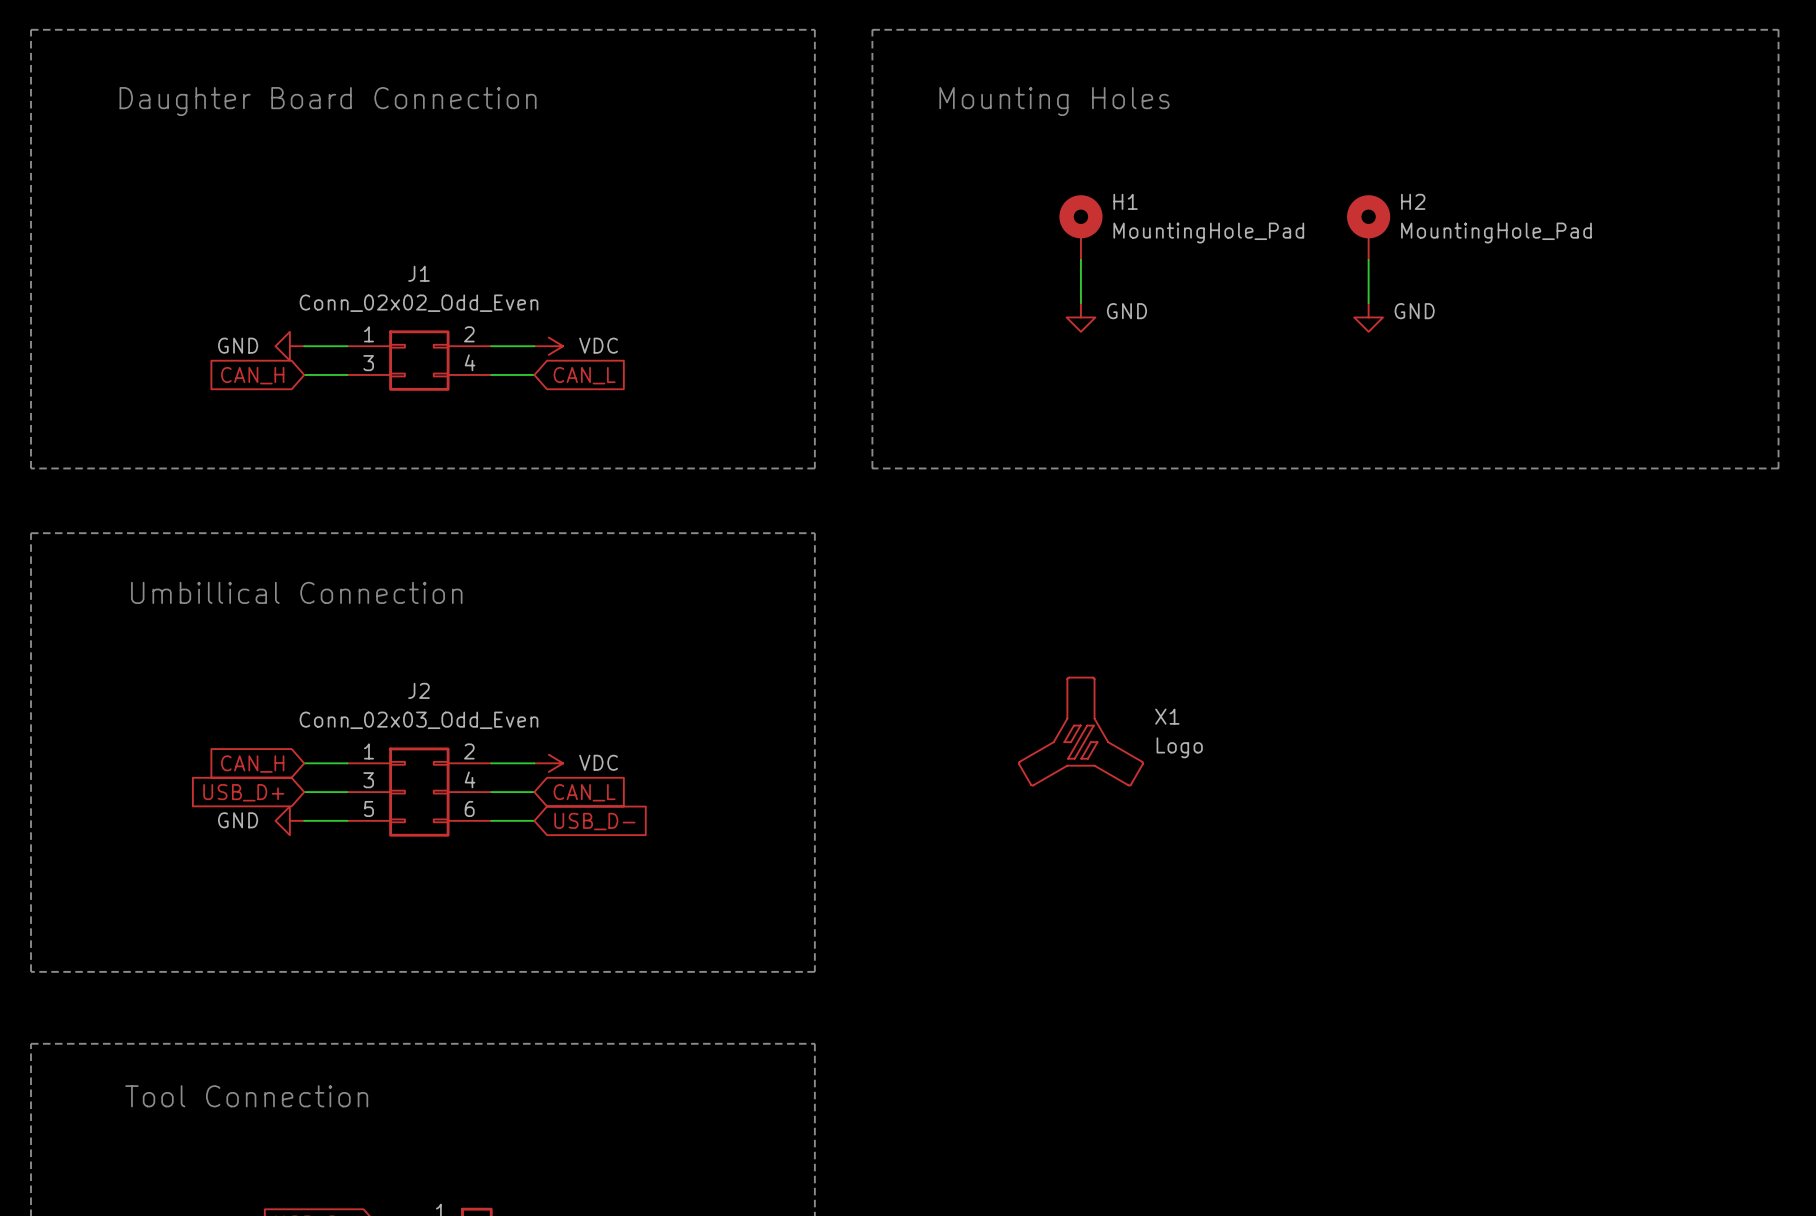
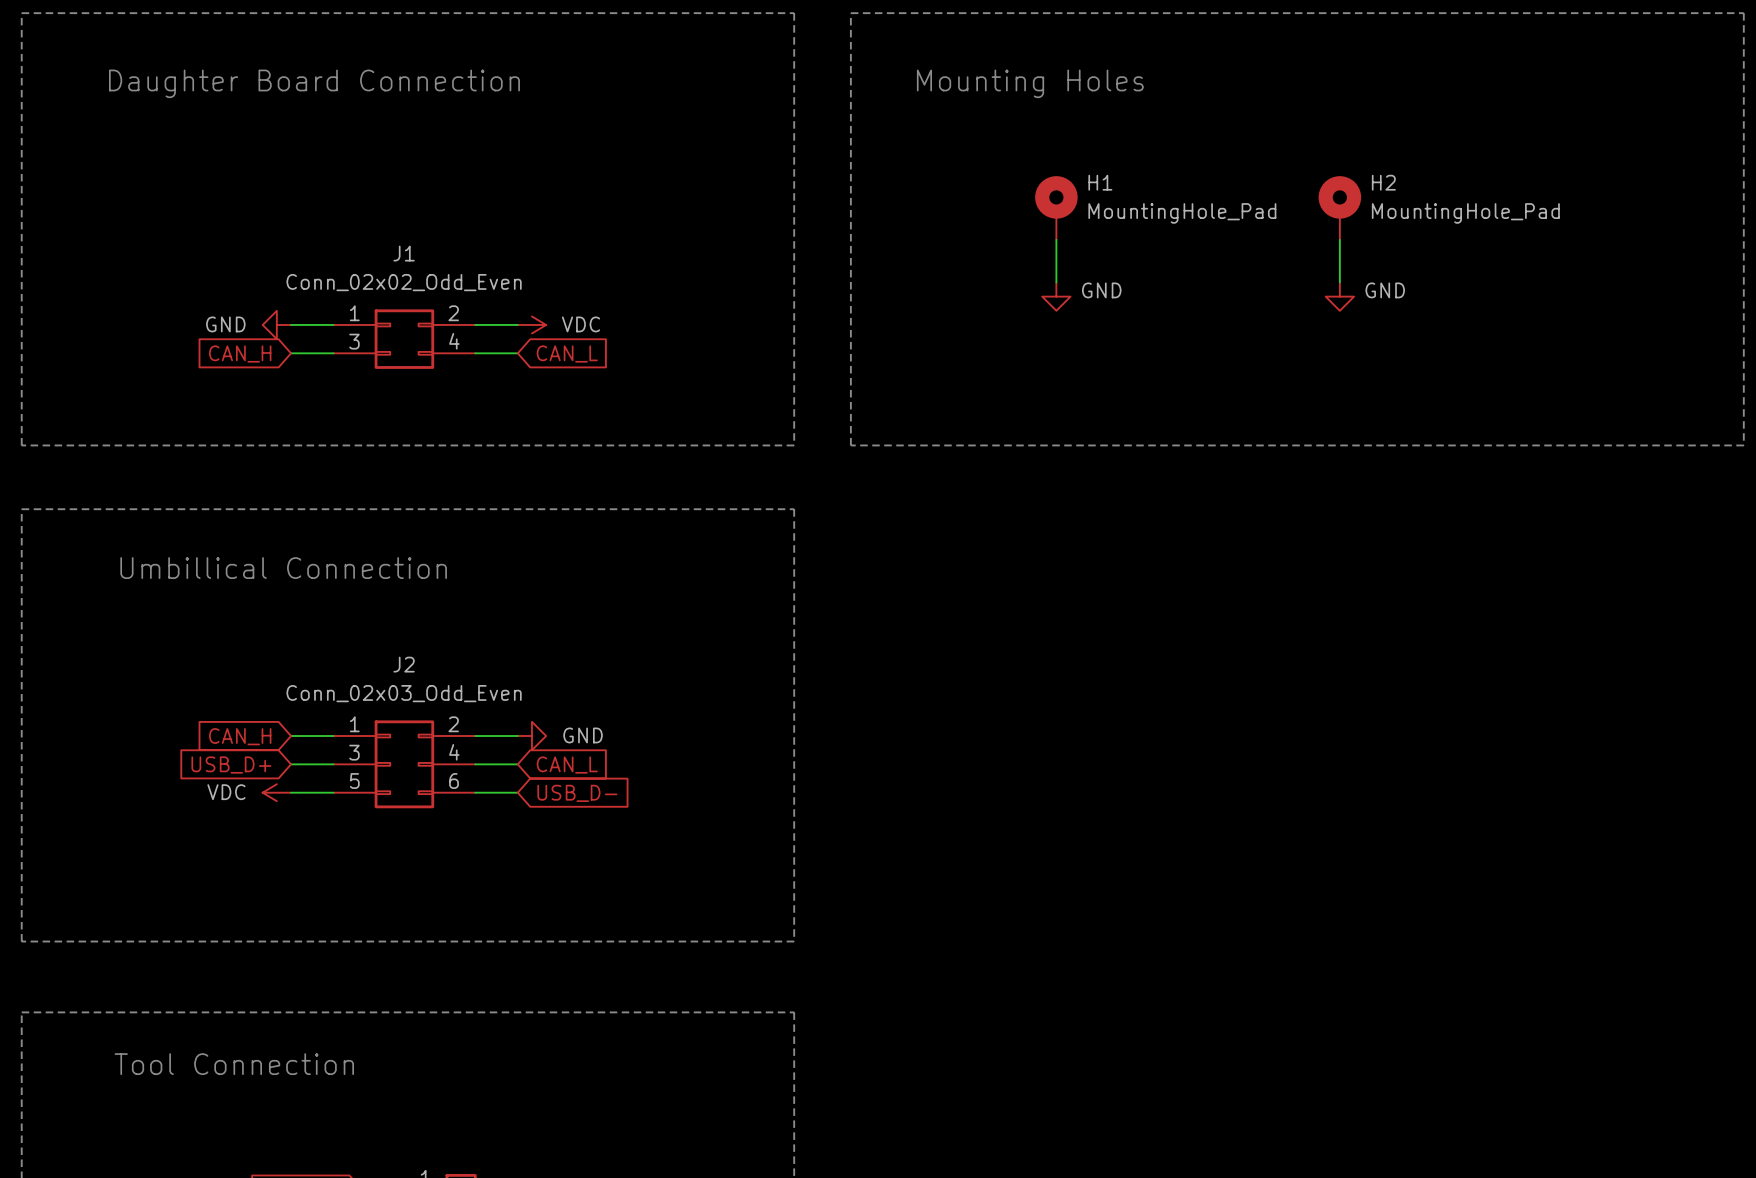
X1: Logo (1080, 731) -> none
power symbol: VDC (548, 763) -> GND (531, 736)
power symbol: GND (289, 820) -> VDC (276, 792)

